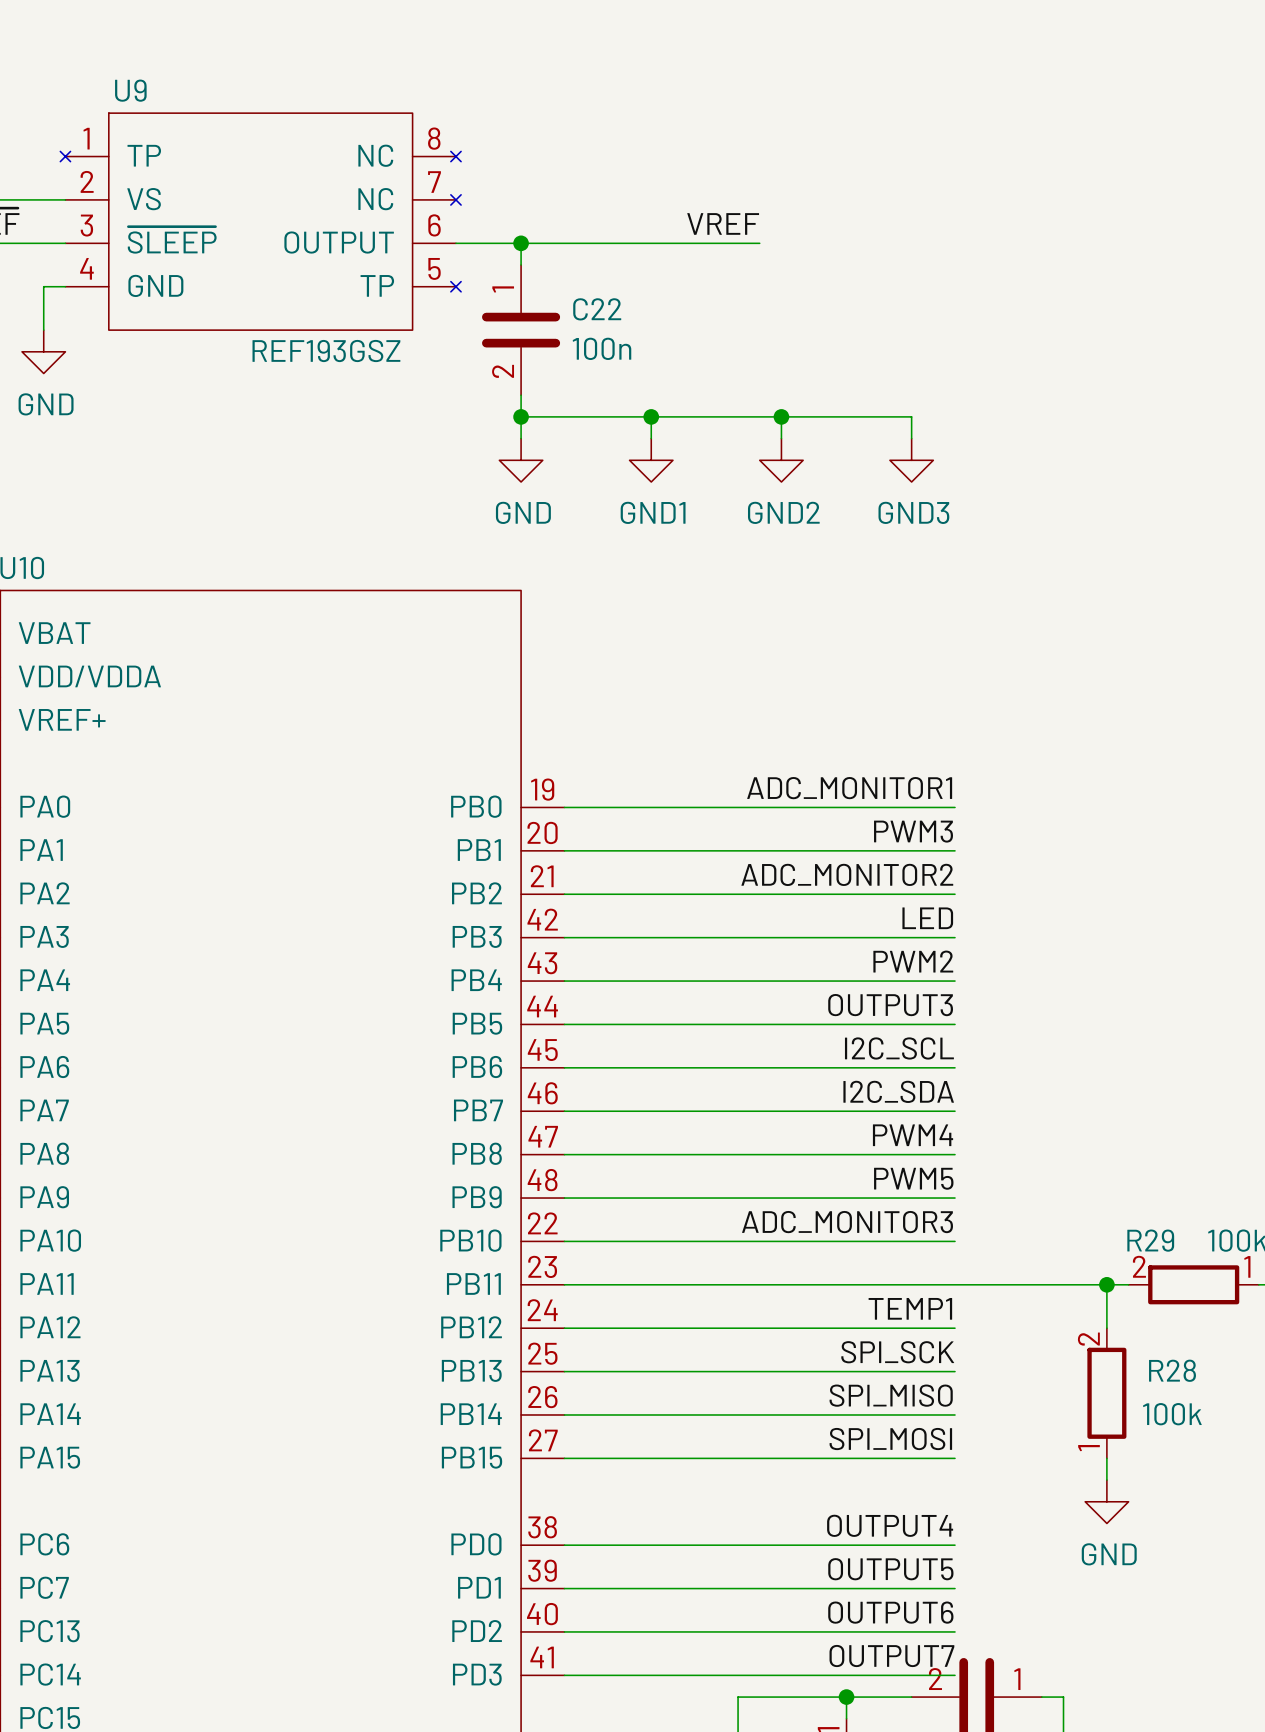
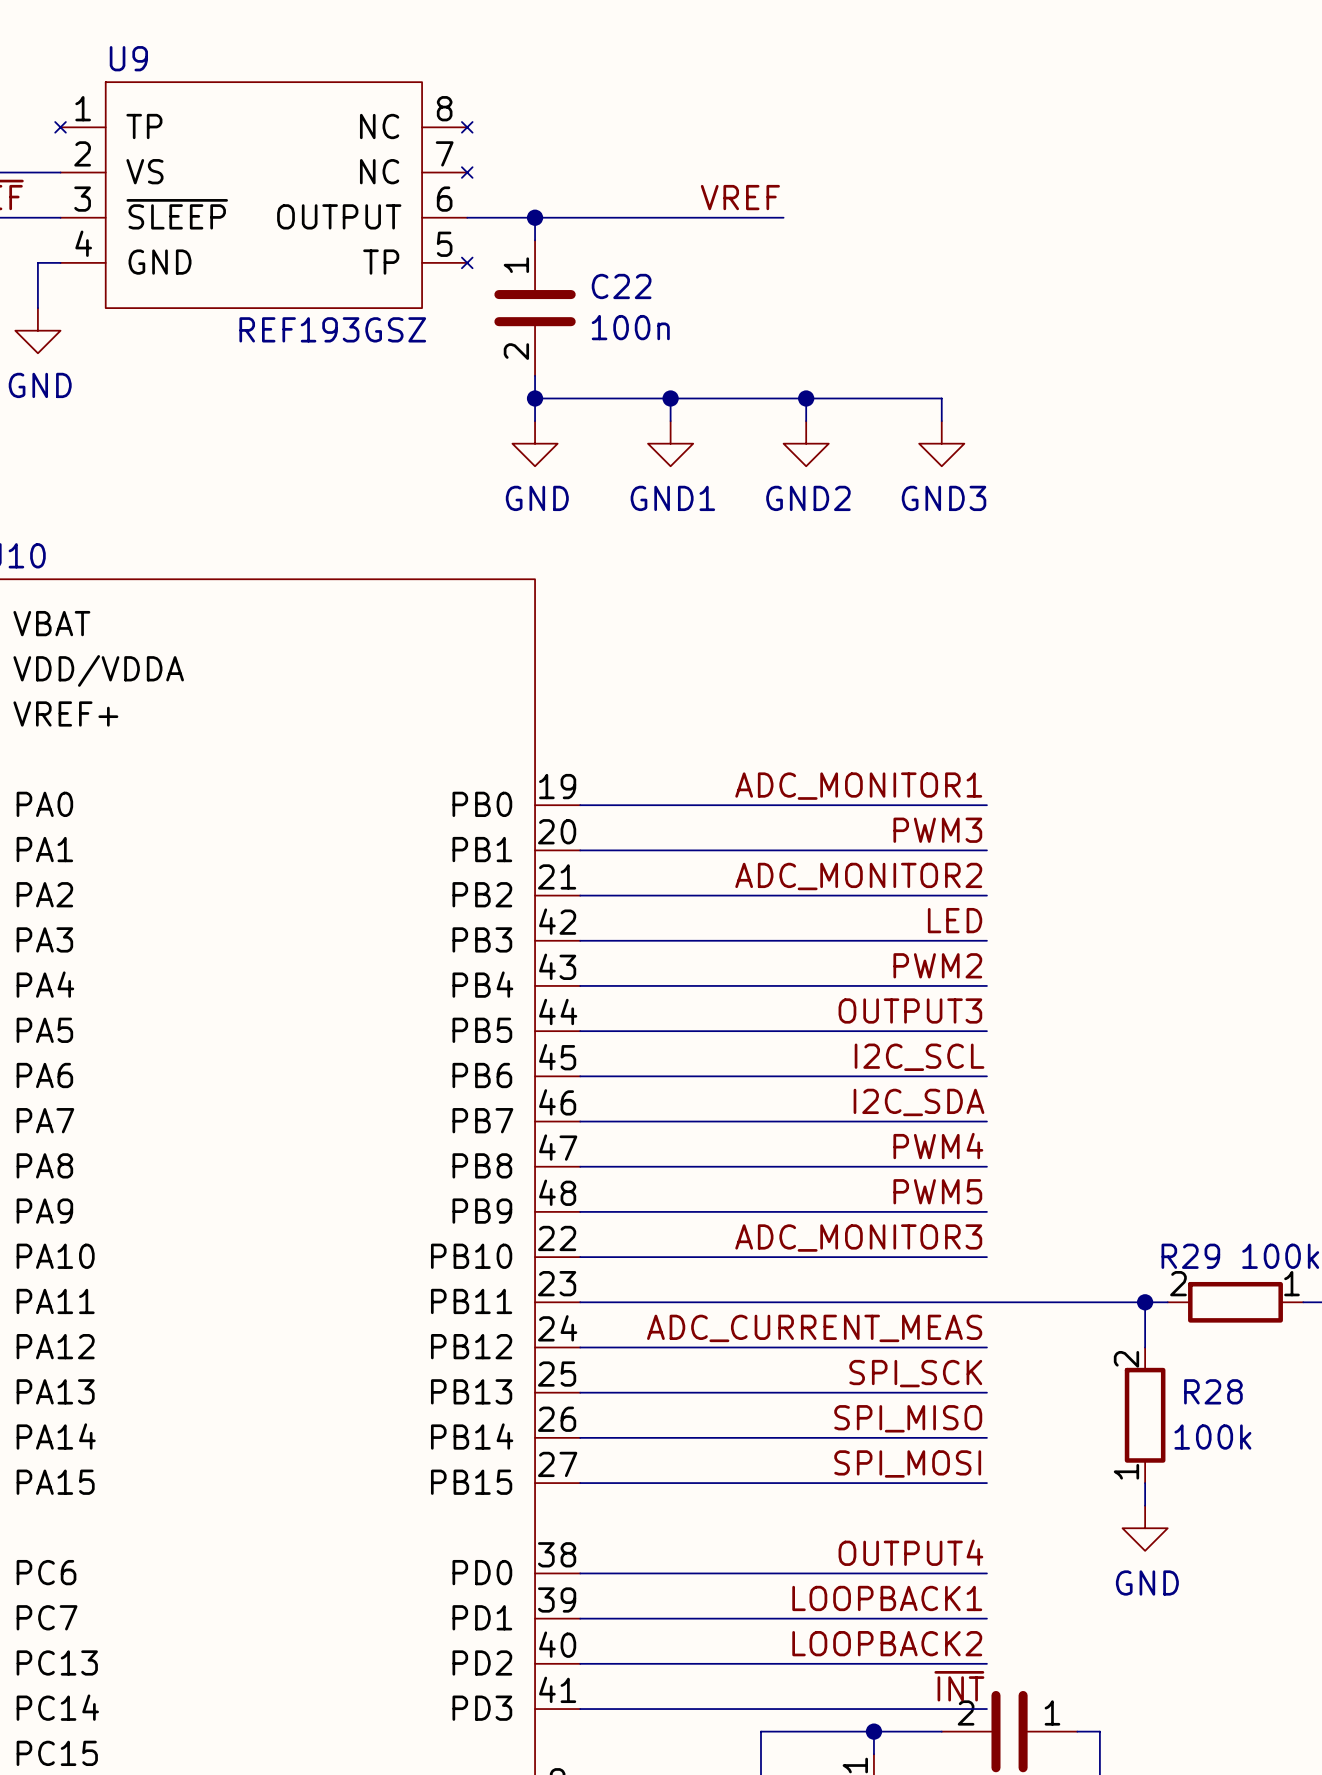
label: TEMP1 (910, 1308) -> ADC_CURRENT_MEAS (814, 1328)
label: OUTPUT5 (890, 1569) -> LOOPBACK1 (887, 1598)
label: OUTPUT6 (890, 1612) -> LOOPBACK2 (887, 1643)
label: OUTPUT7 (891, 1656) -> ~{INT} (959, 1686)

